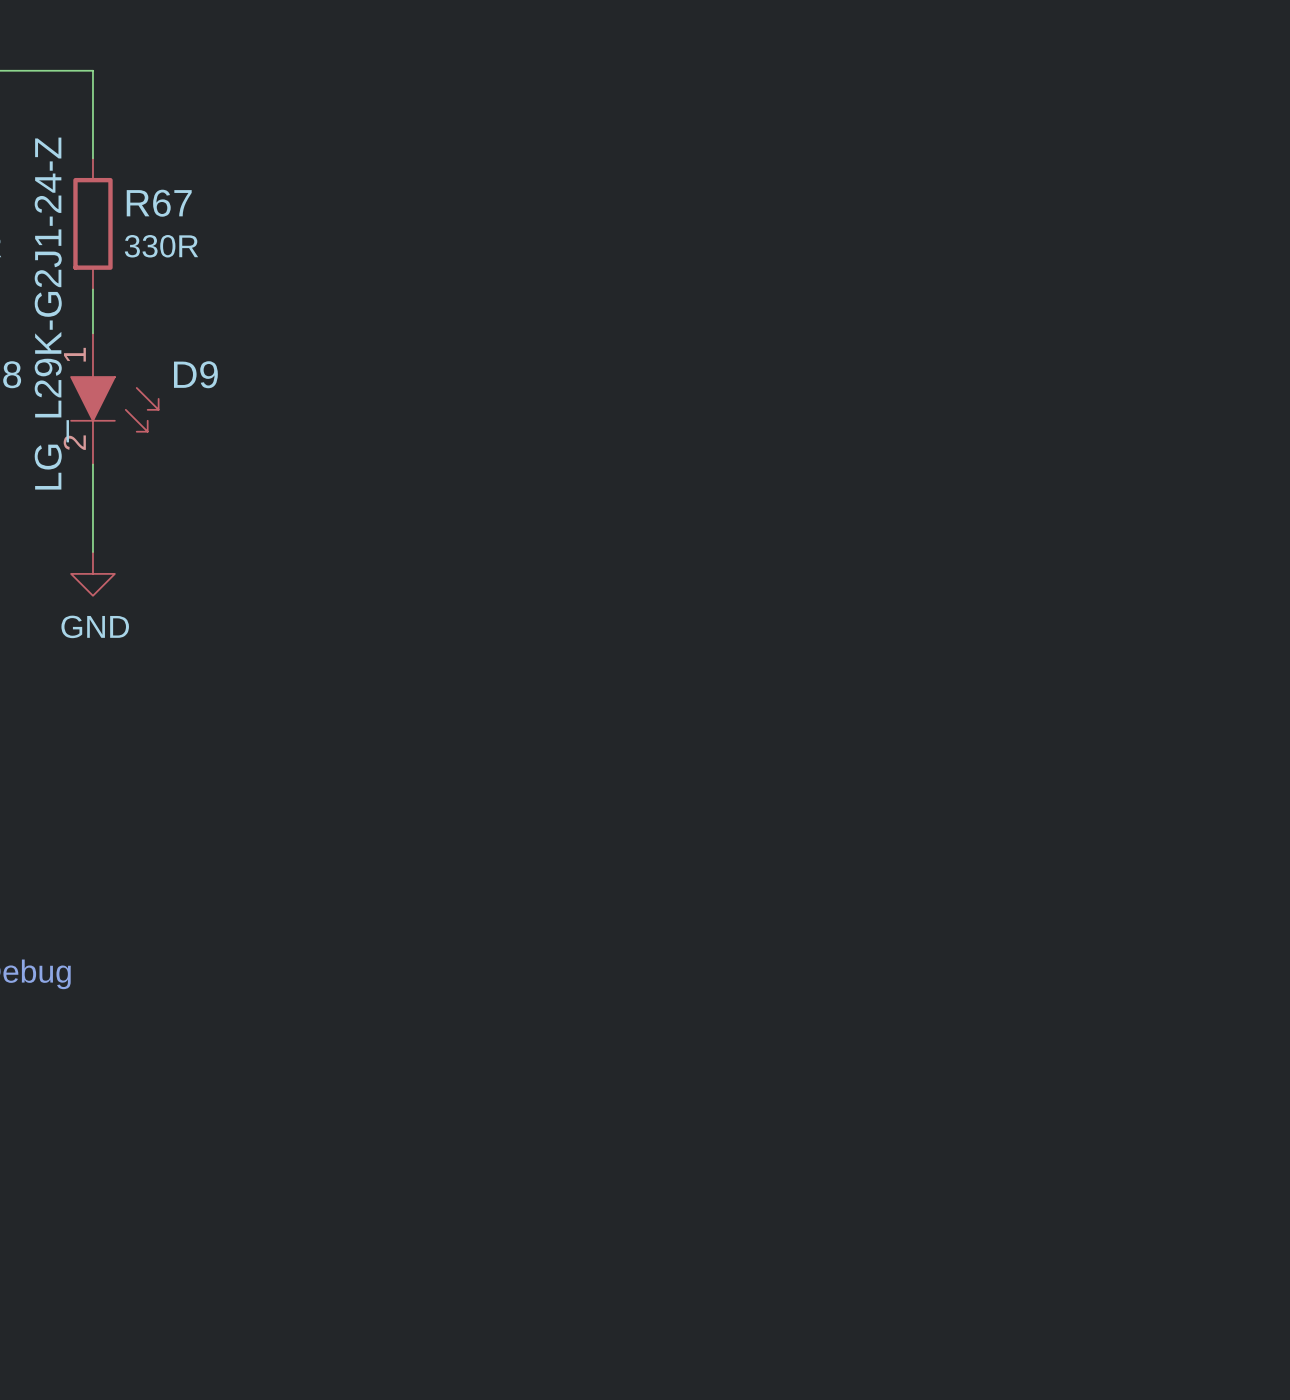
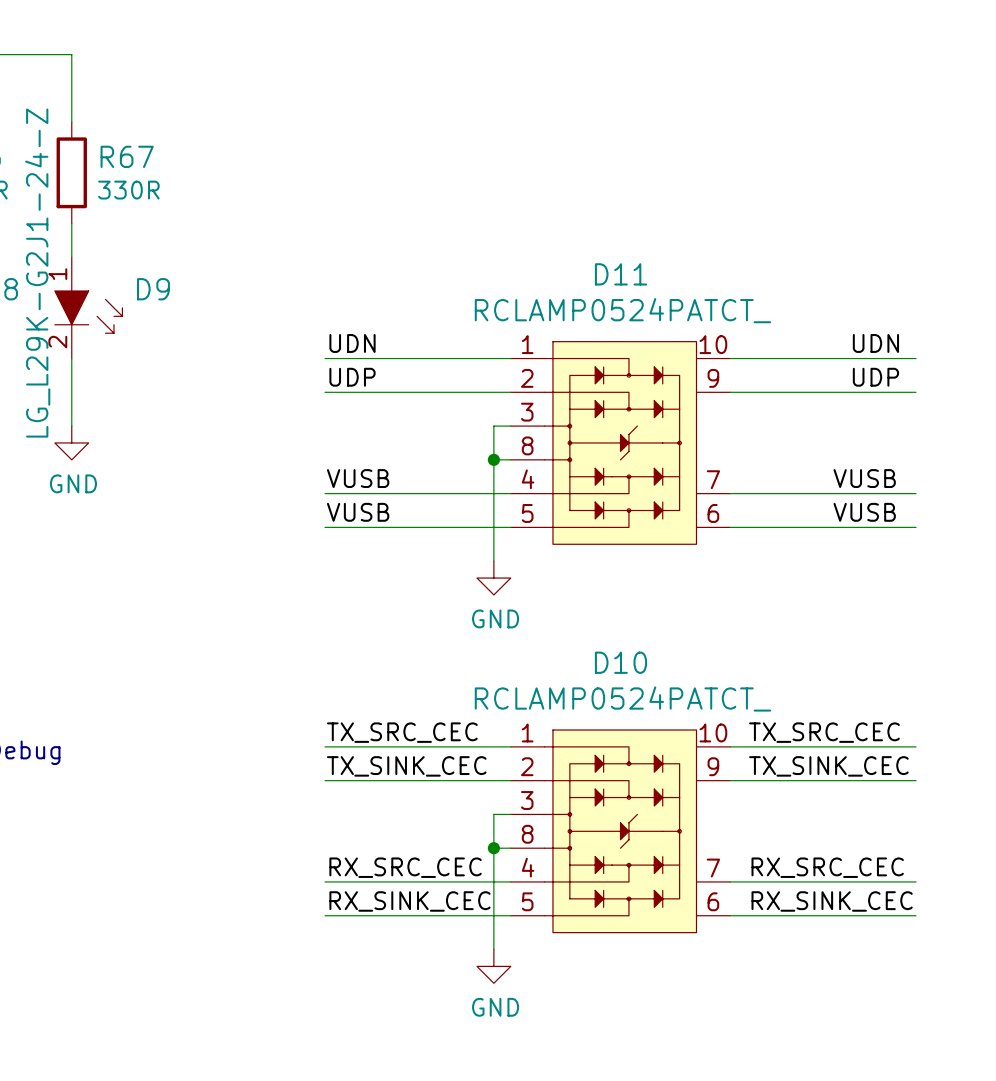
label: none -> UDN (352, 343)
label: none -> UDN (875, 343)
wire: none -> (325, 358) (510, 358)
wire: none -> (730, 358) (916, 358)
label: none -> UDP (352, 377)
label: none -> UDP (875, 377)
wire: none -> (325, 392) (510, 392)
wire: none -> (730, 392) (916, 392)
wire: none -> (510, 426) (493, 426) (493, 561)
D11: none -> RCLAMP0524PATCT_ (620, 442)
wire: none -> (493, 459) (510, 459)
junction: none -> (493, 459)
label: none -> VUSB (358, 478)
label: none -> VUSB (864, 478)
wire: none -> (325, 493) (510, 493)
wire: none -> (730, 493) (916, 493)
label: none -> VUSB (358, 512)
label: none -> VUSB (864, 512)
wire: none -> (325, 527) (510, 527)
wire: none -> (730, 527) (916, 527)
power symbol: none -> GND (493, 578)
label: none -> TX_SRC_CEC (402, 732)
label: none -> TX_SRC_CEC (824, 732)
wire: none -> (325, 746) (510, 746)
wire: none -> (730, 746) (916, 746)
label: none -> TX_SINK_CEC (406, 766)
label: none -> TX_SINK_CEC (828, 766)
wire: none -> (325, 780) (510, 780)
wire: none -> (730, 780) (916, 780)
wire: none -> (510, 814) (493, 814) (493, 949)
D10: none -> RCLAMP0524PATCT_ (620, 831)
wire: none -> (493, 848) (510, 848)
junction: none -> (493, 848)
label: none -> RX_SRC_CEC (405, 867)
label: none -> RX_SRC_CEC (827, 867)
wire: none -> (325, 881) (510, 881)
wire: none -> (730, 881) (916, 881)
label: none -> RX_SINK_CEC (409, 901)
label: none -> RX_SINK_CEC (832, 901)
wire: none -> (325, 915) (510, 915)
wire: none -> (730, 915) (916, 915)
power symbol: none -> GND (493, 966)

